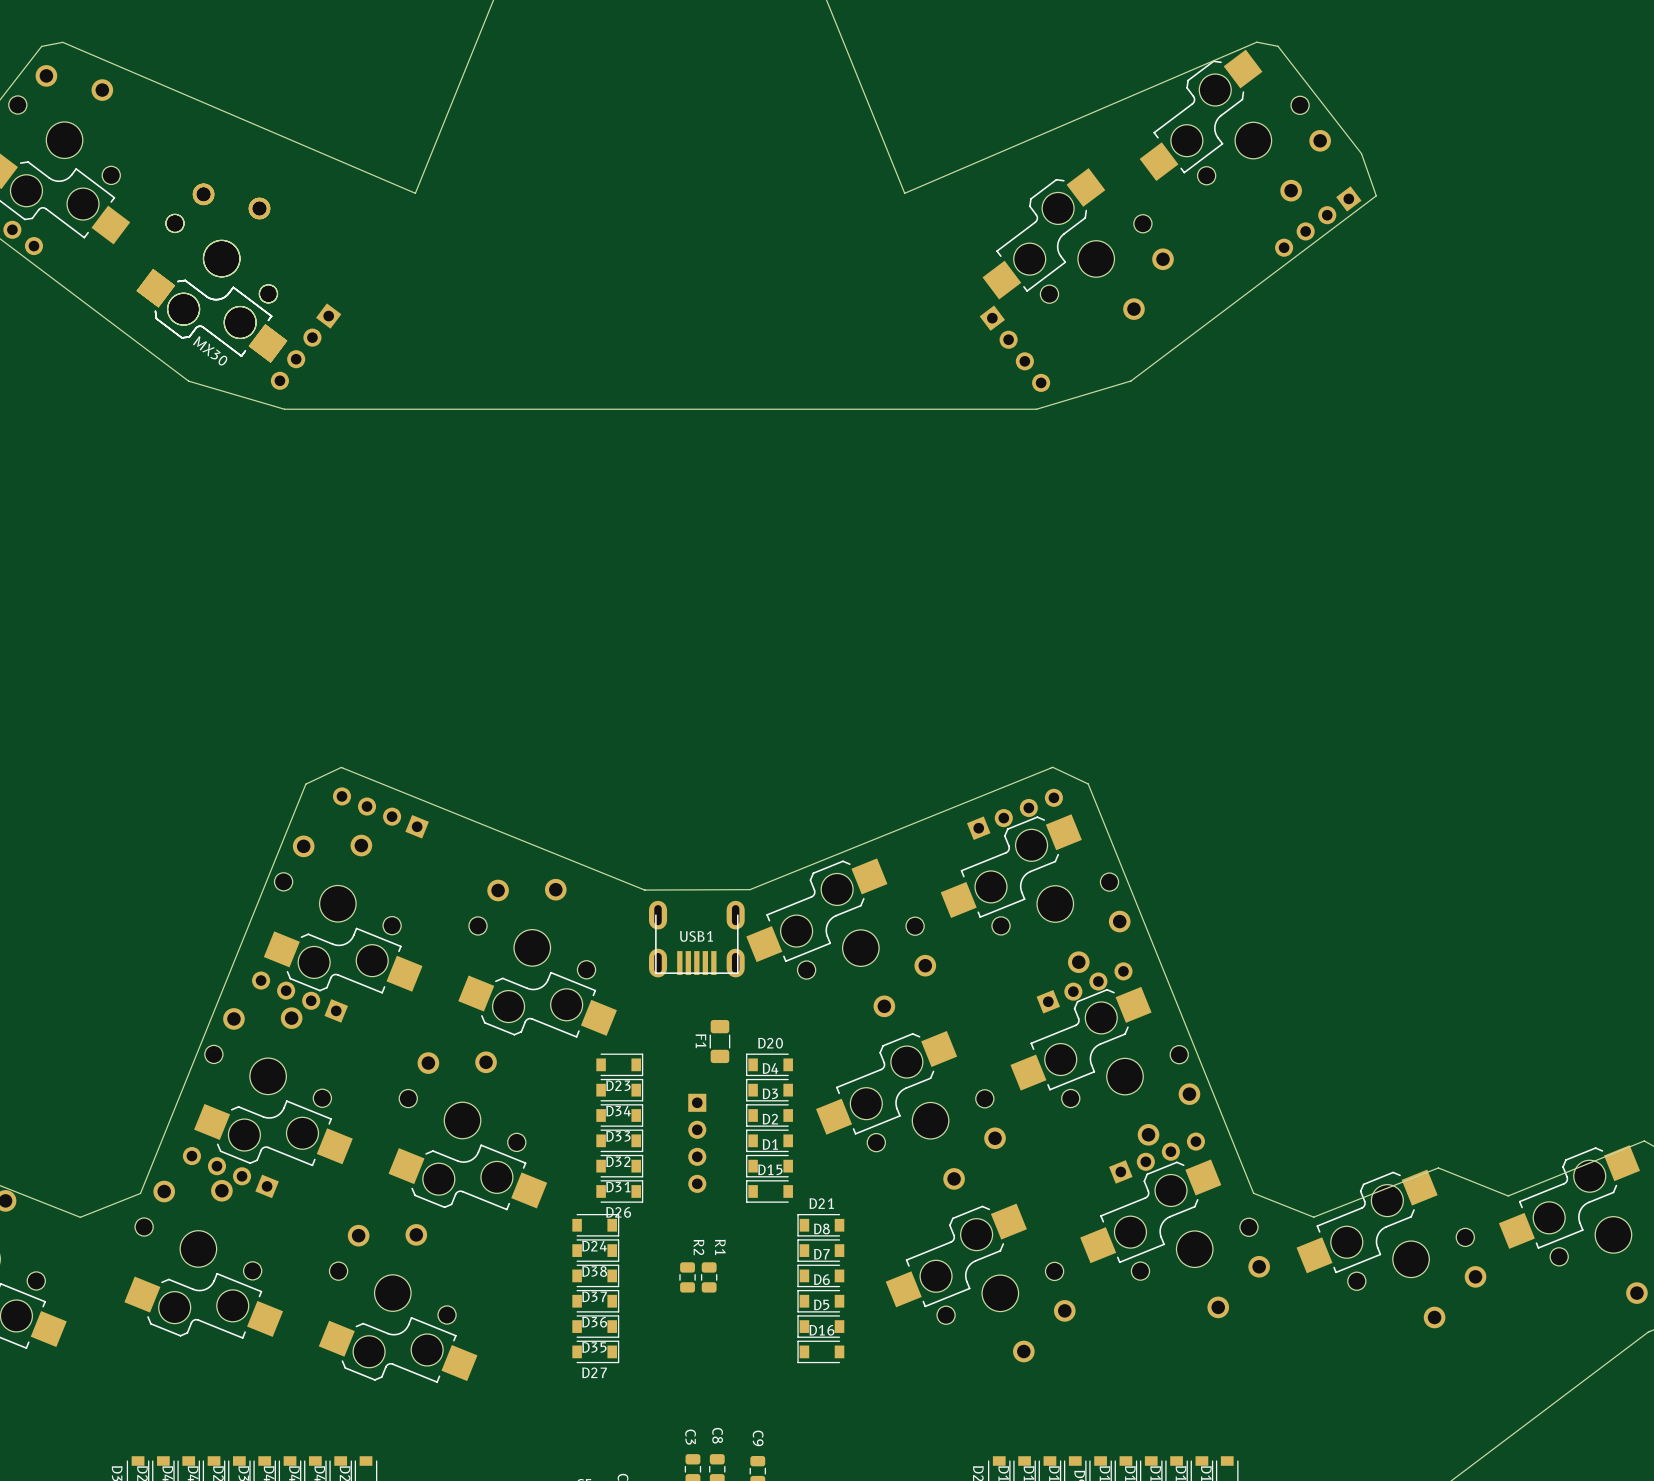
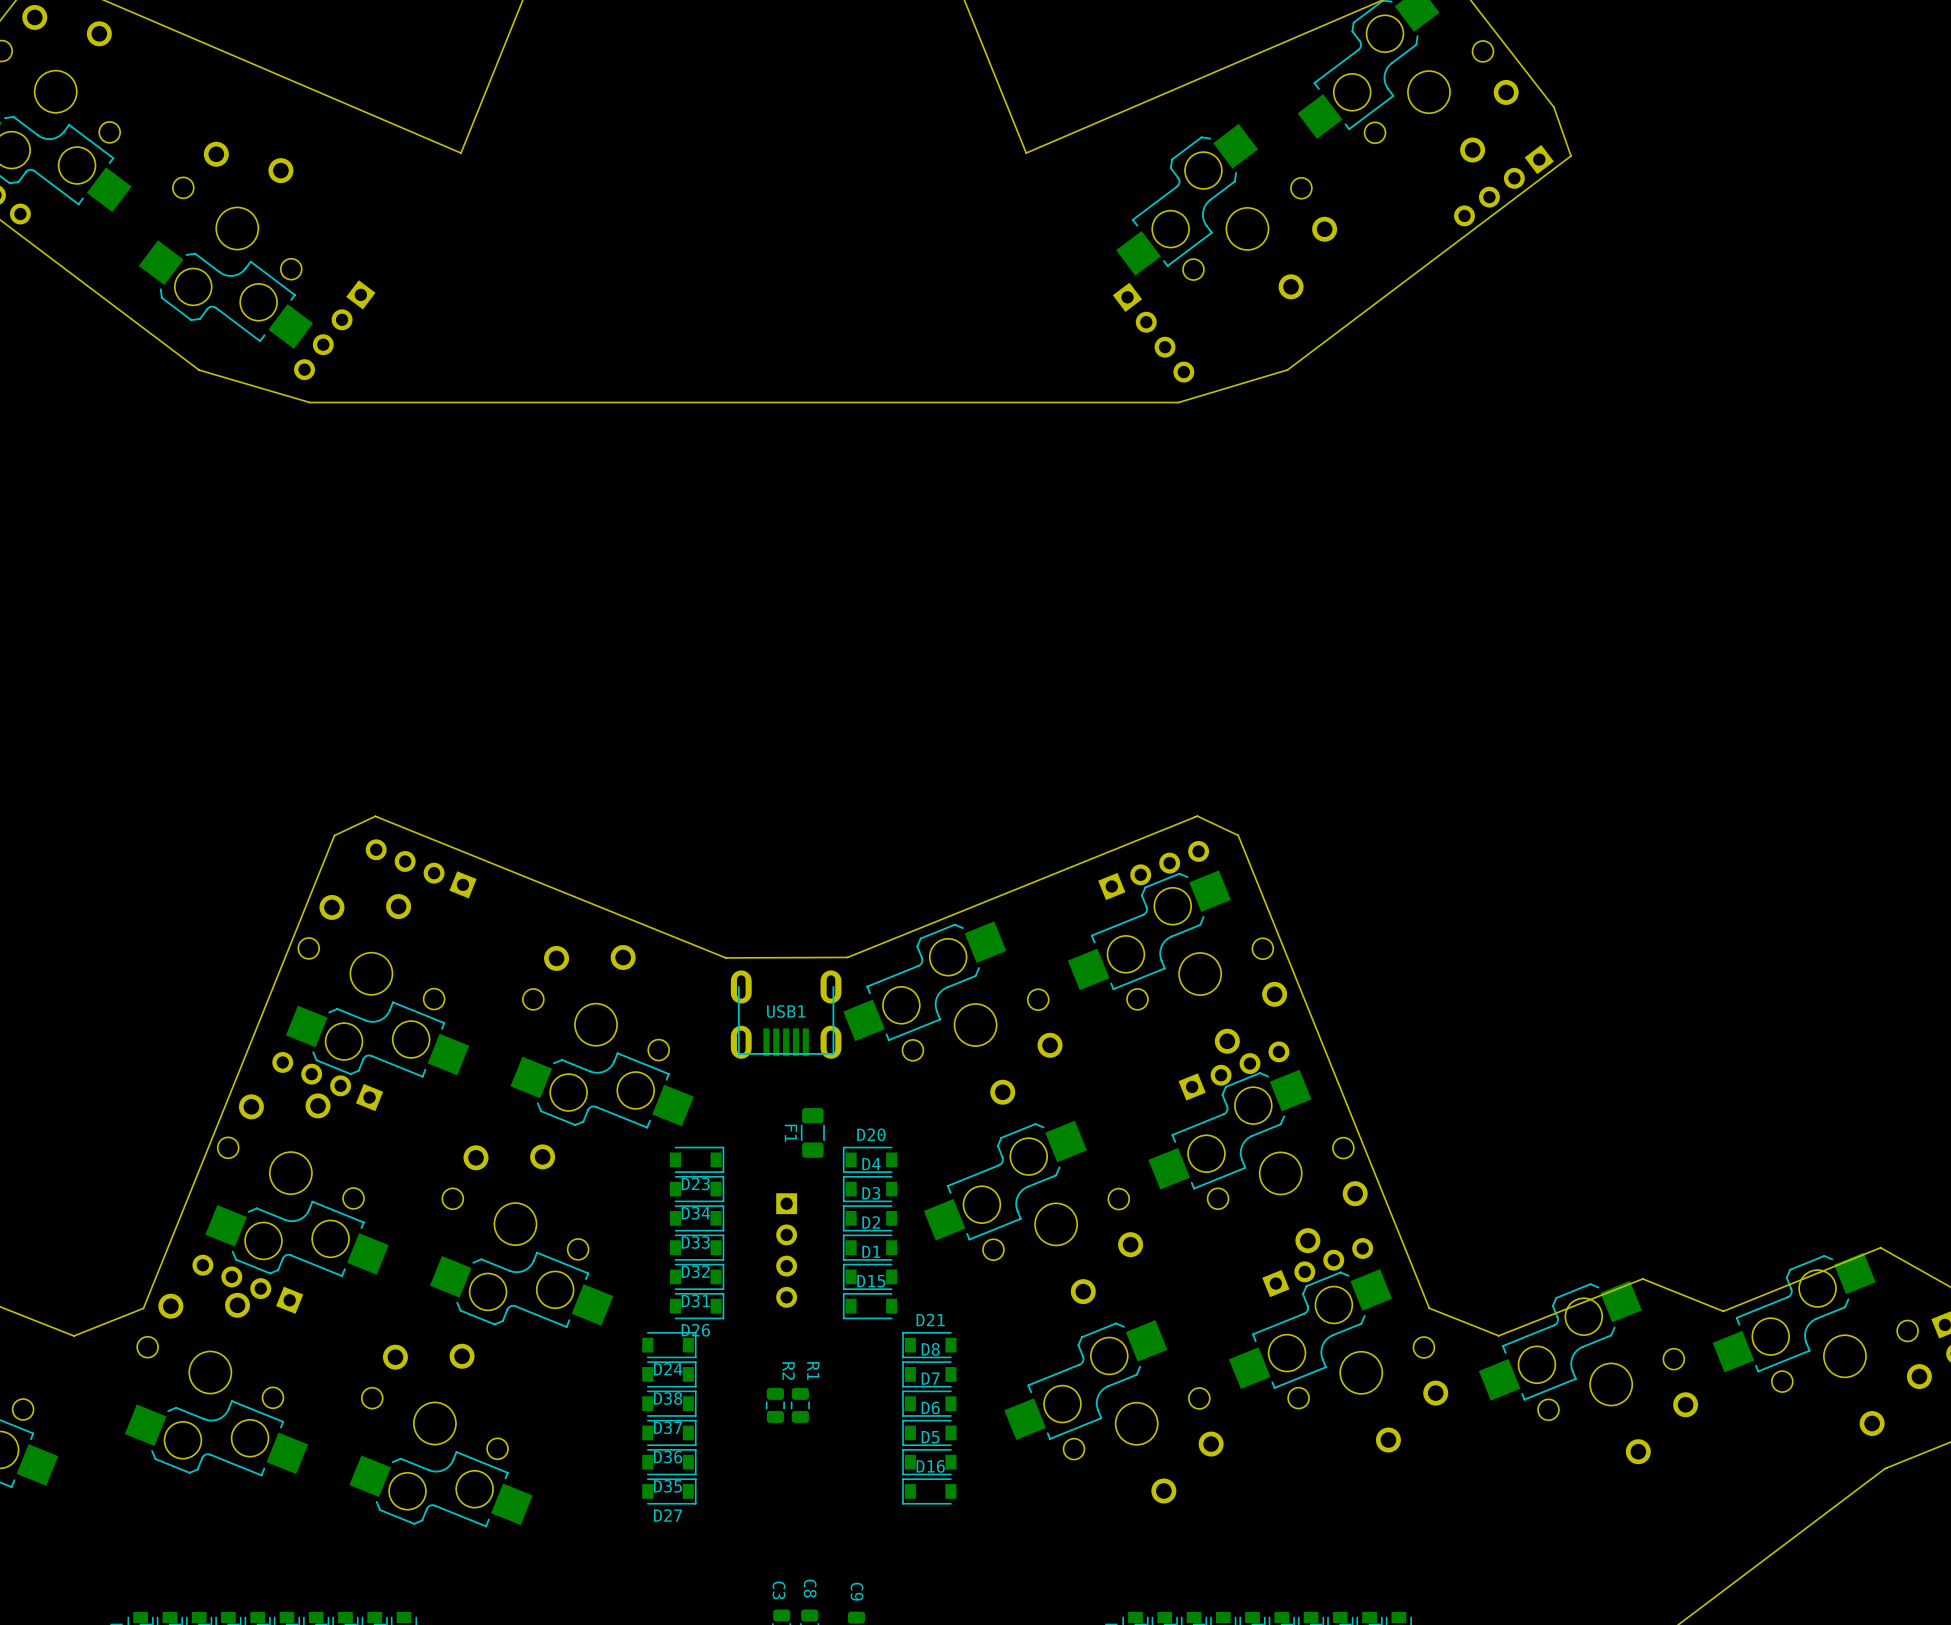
MX30: (211, 273) -> none

